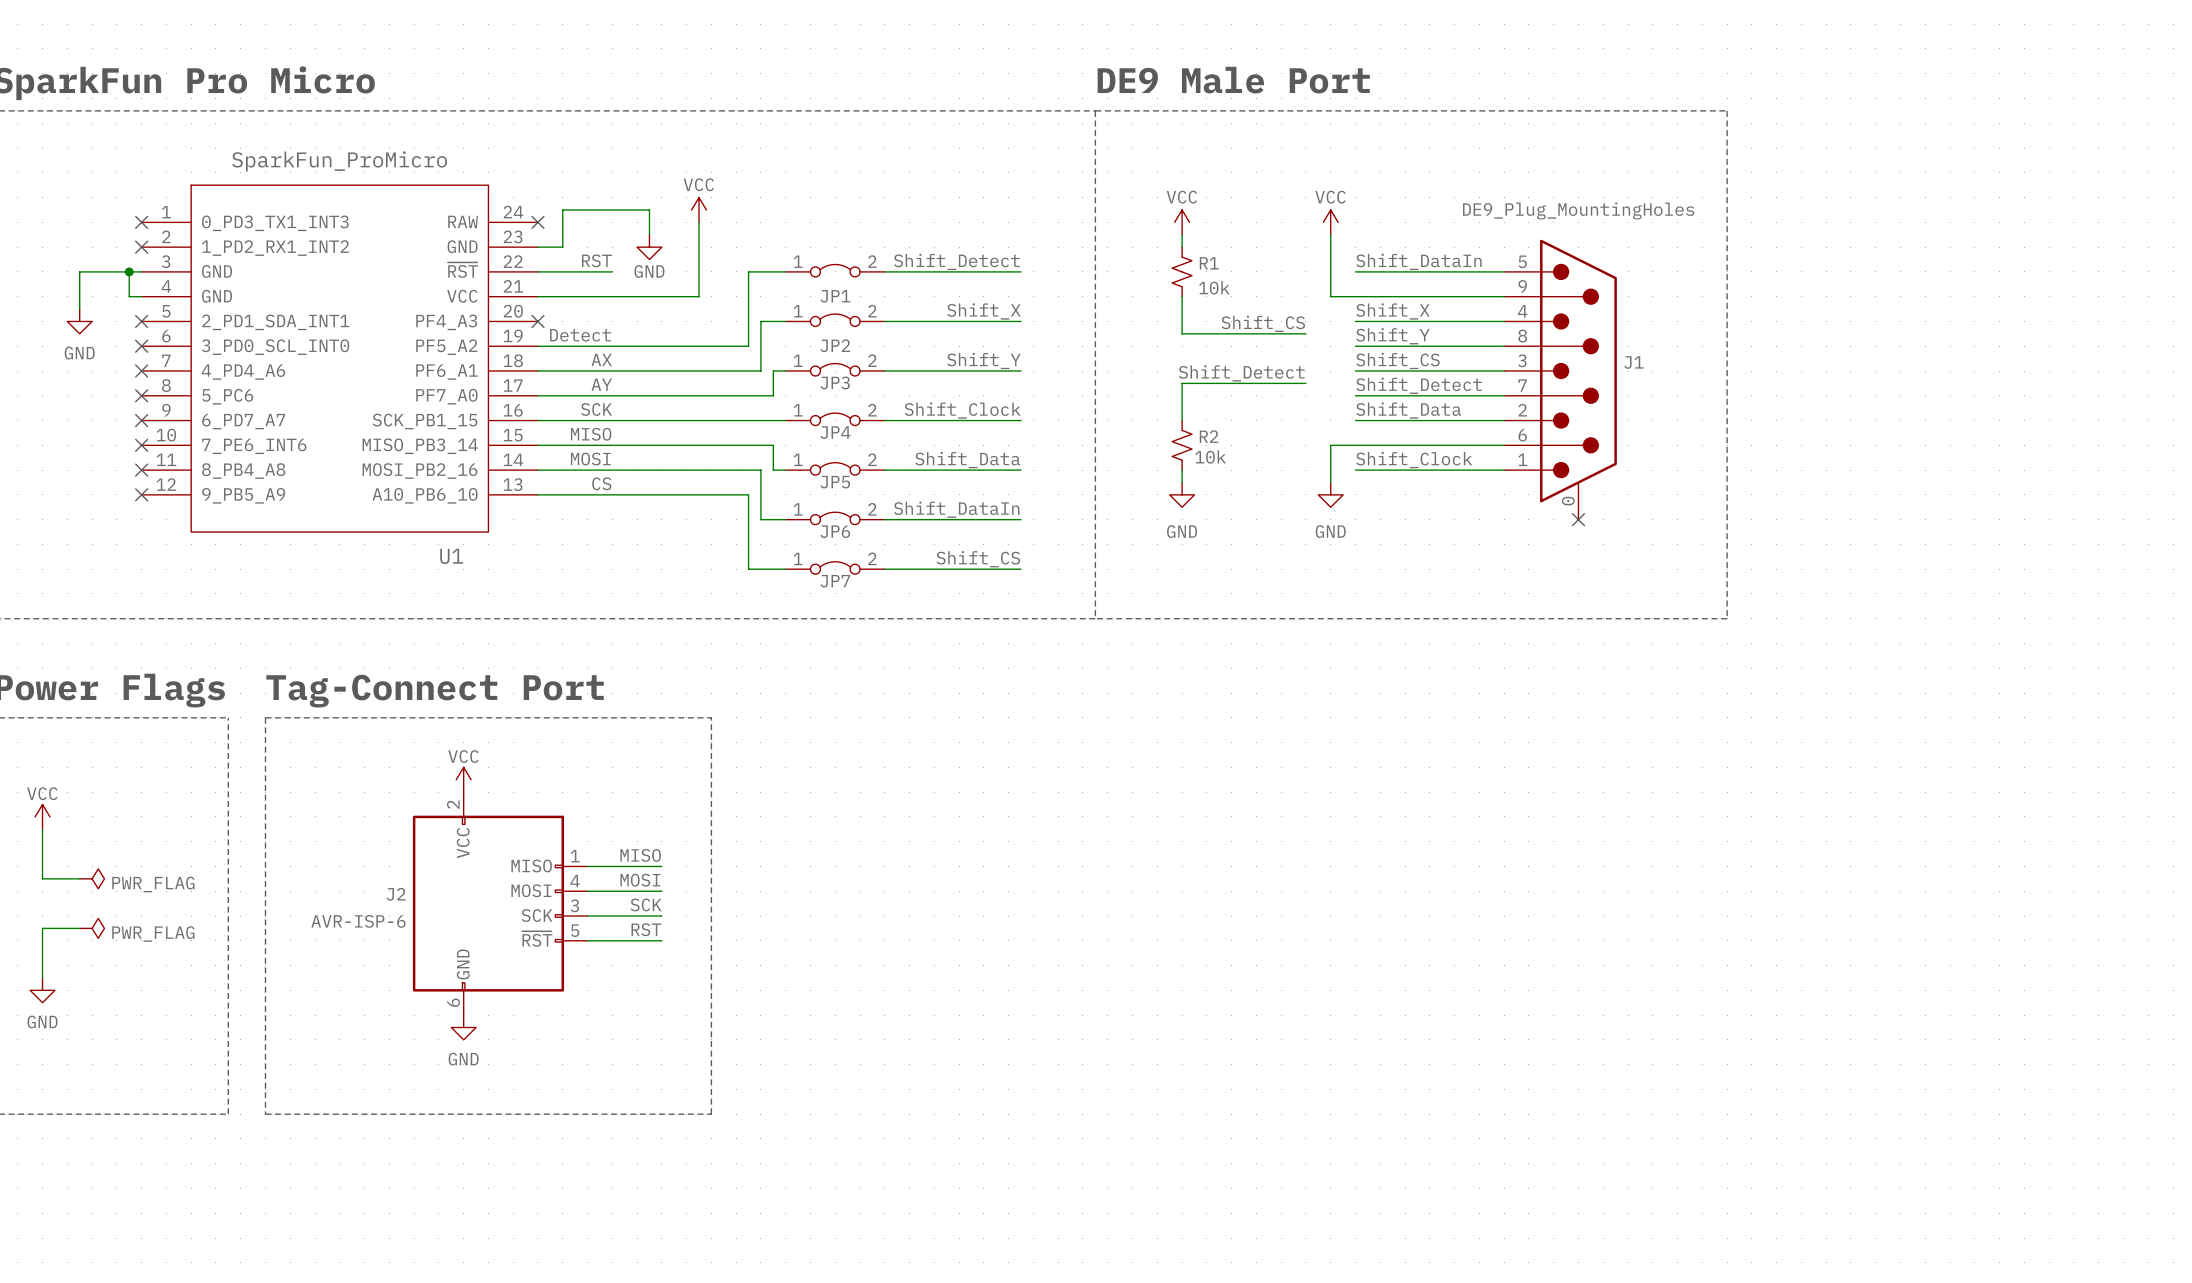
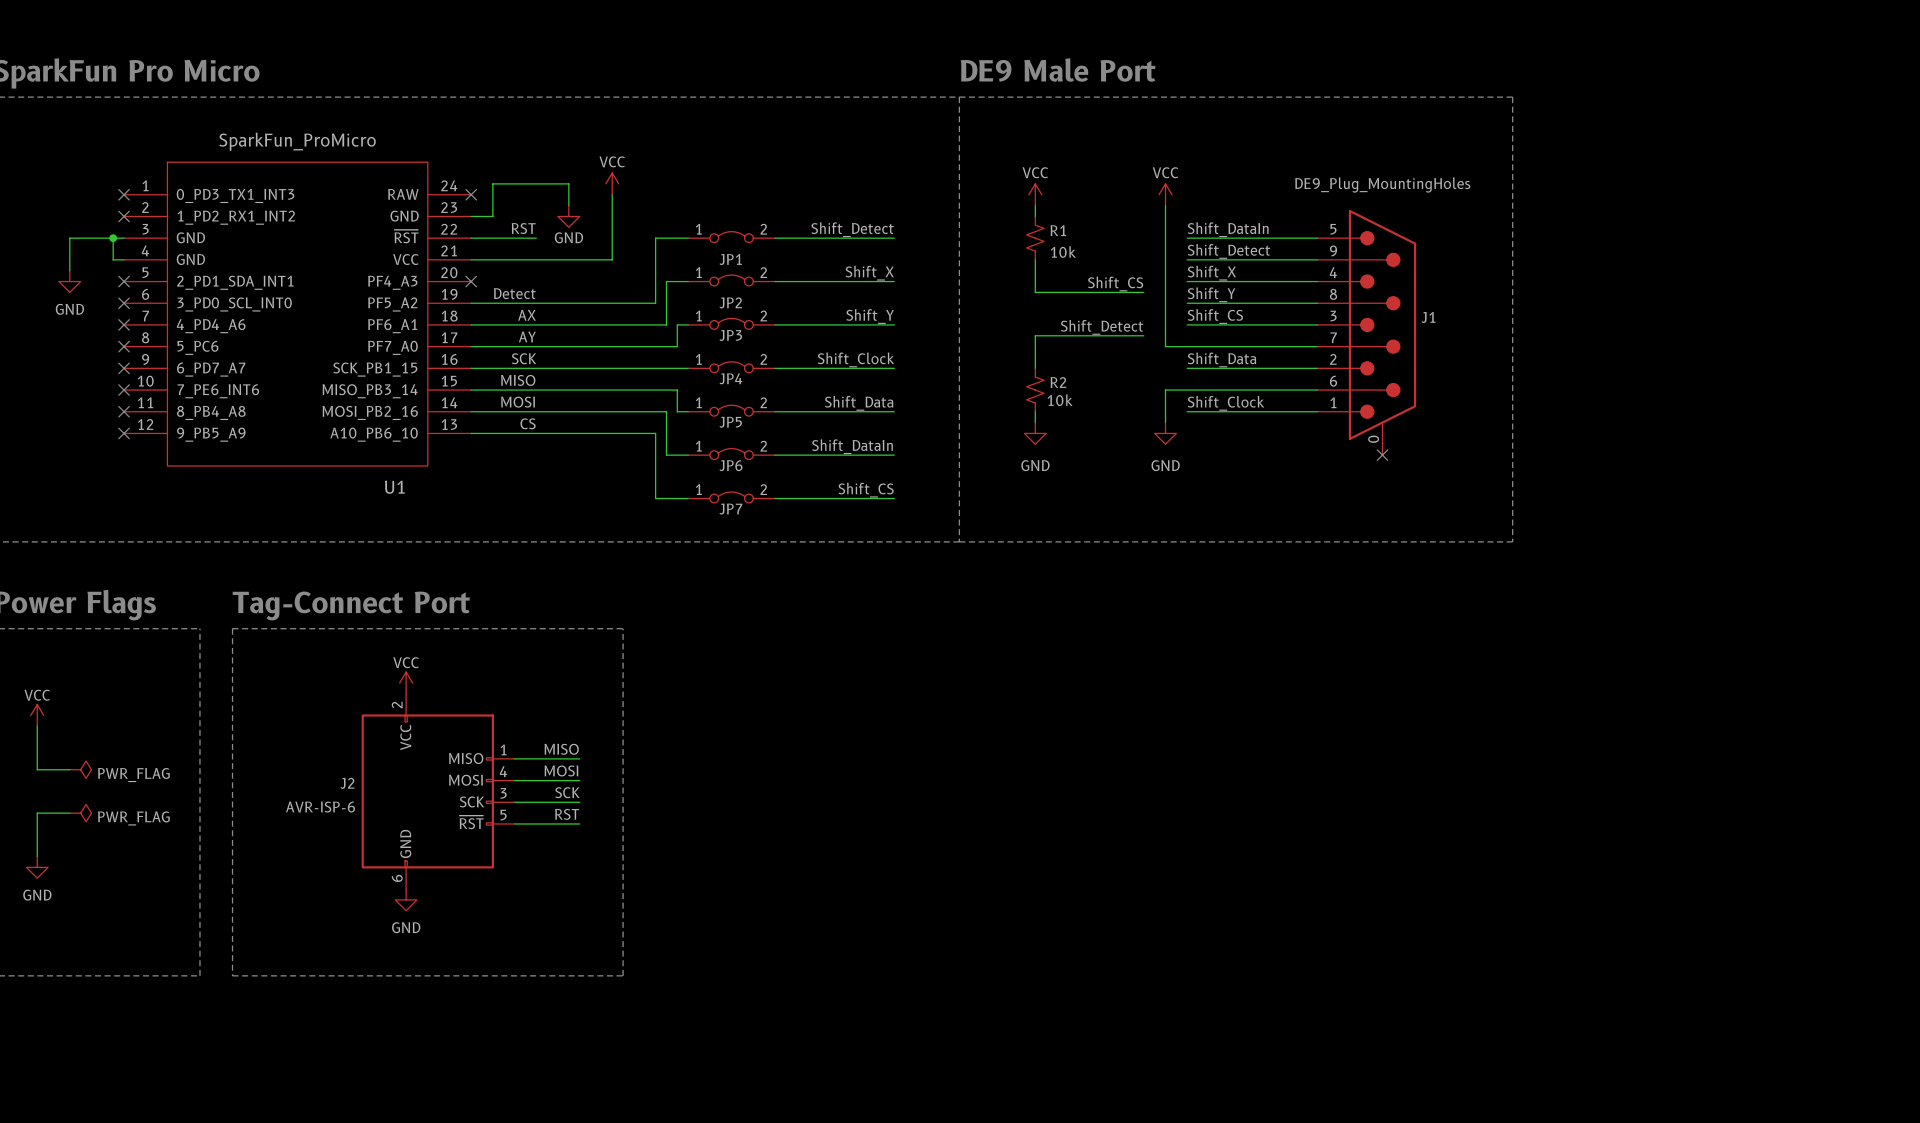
wire: (1330, 296) (1355, 296) -> (1165, 259) (1165, 346) (1187, 346)
label position: Shift_Detect (1419, 385) -> Shift_Detect (1228, 251)

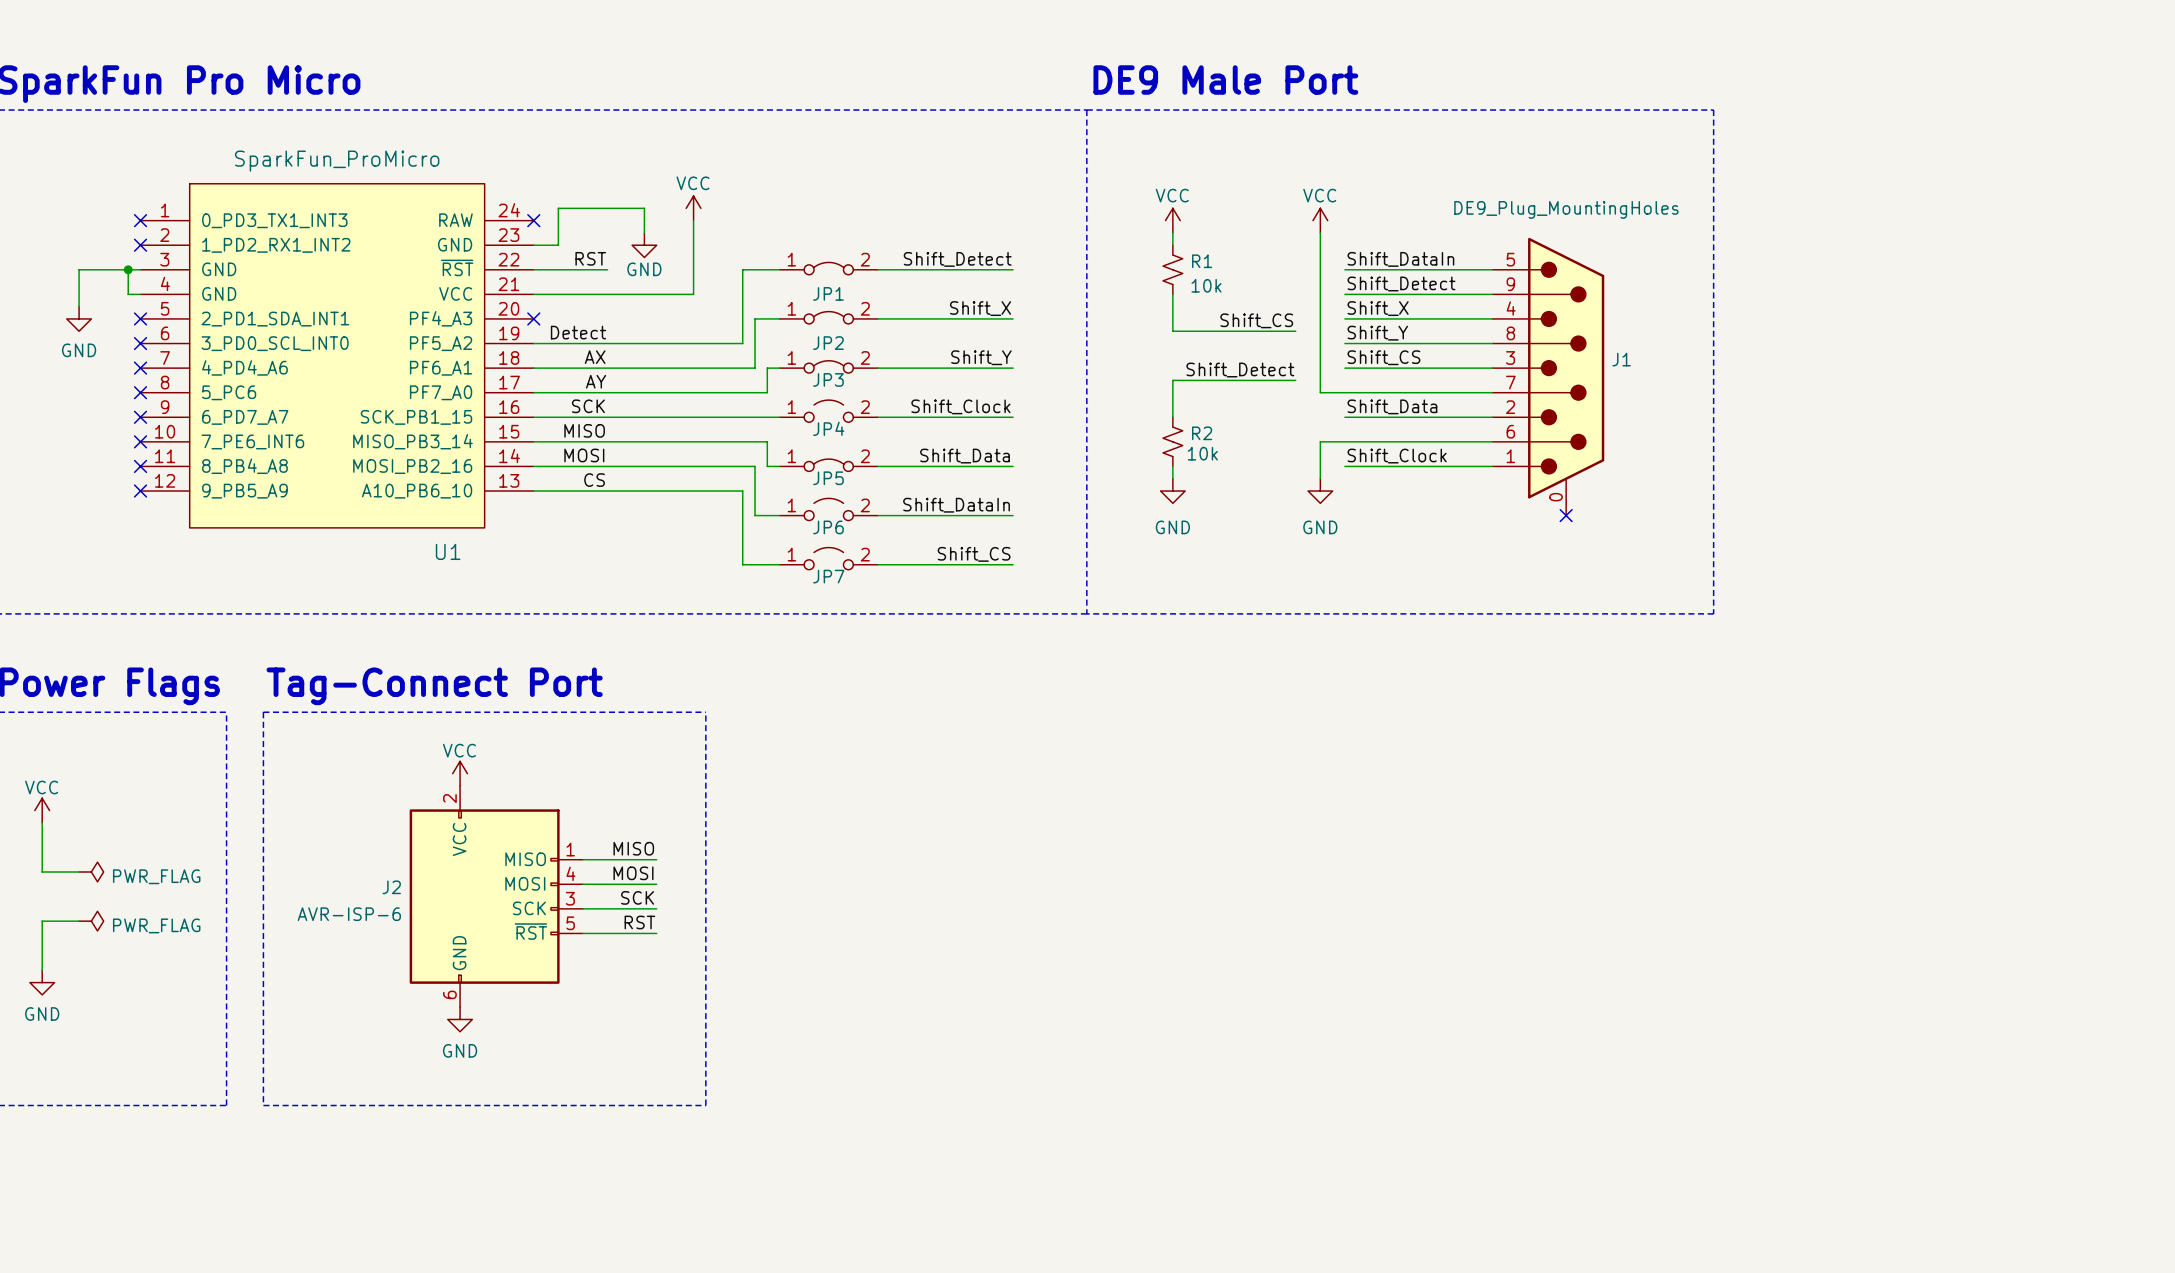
JP4 symbol: [688, 361, 775, 373] -> [779, 400, 878, 423]
JP6 symbol: [688, 448, 775, 460] -> [779, 498, 878, 521]
JP7 symbol: [688, 492, 775, 503] -> [779, 547, 878, 570]

